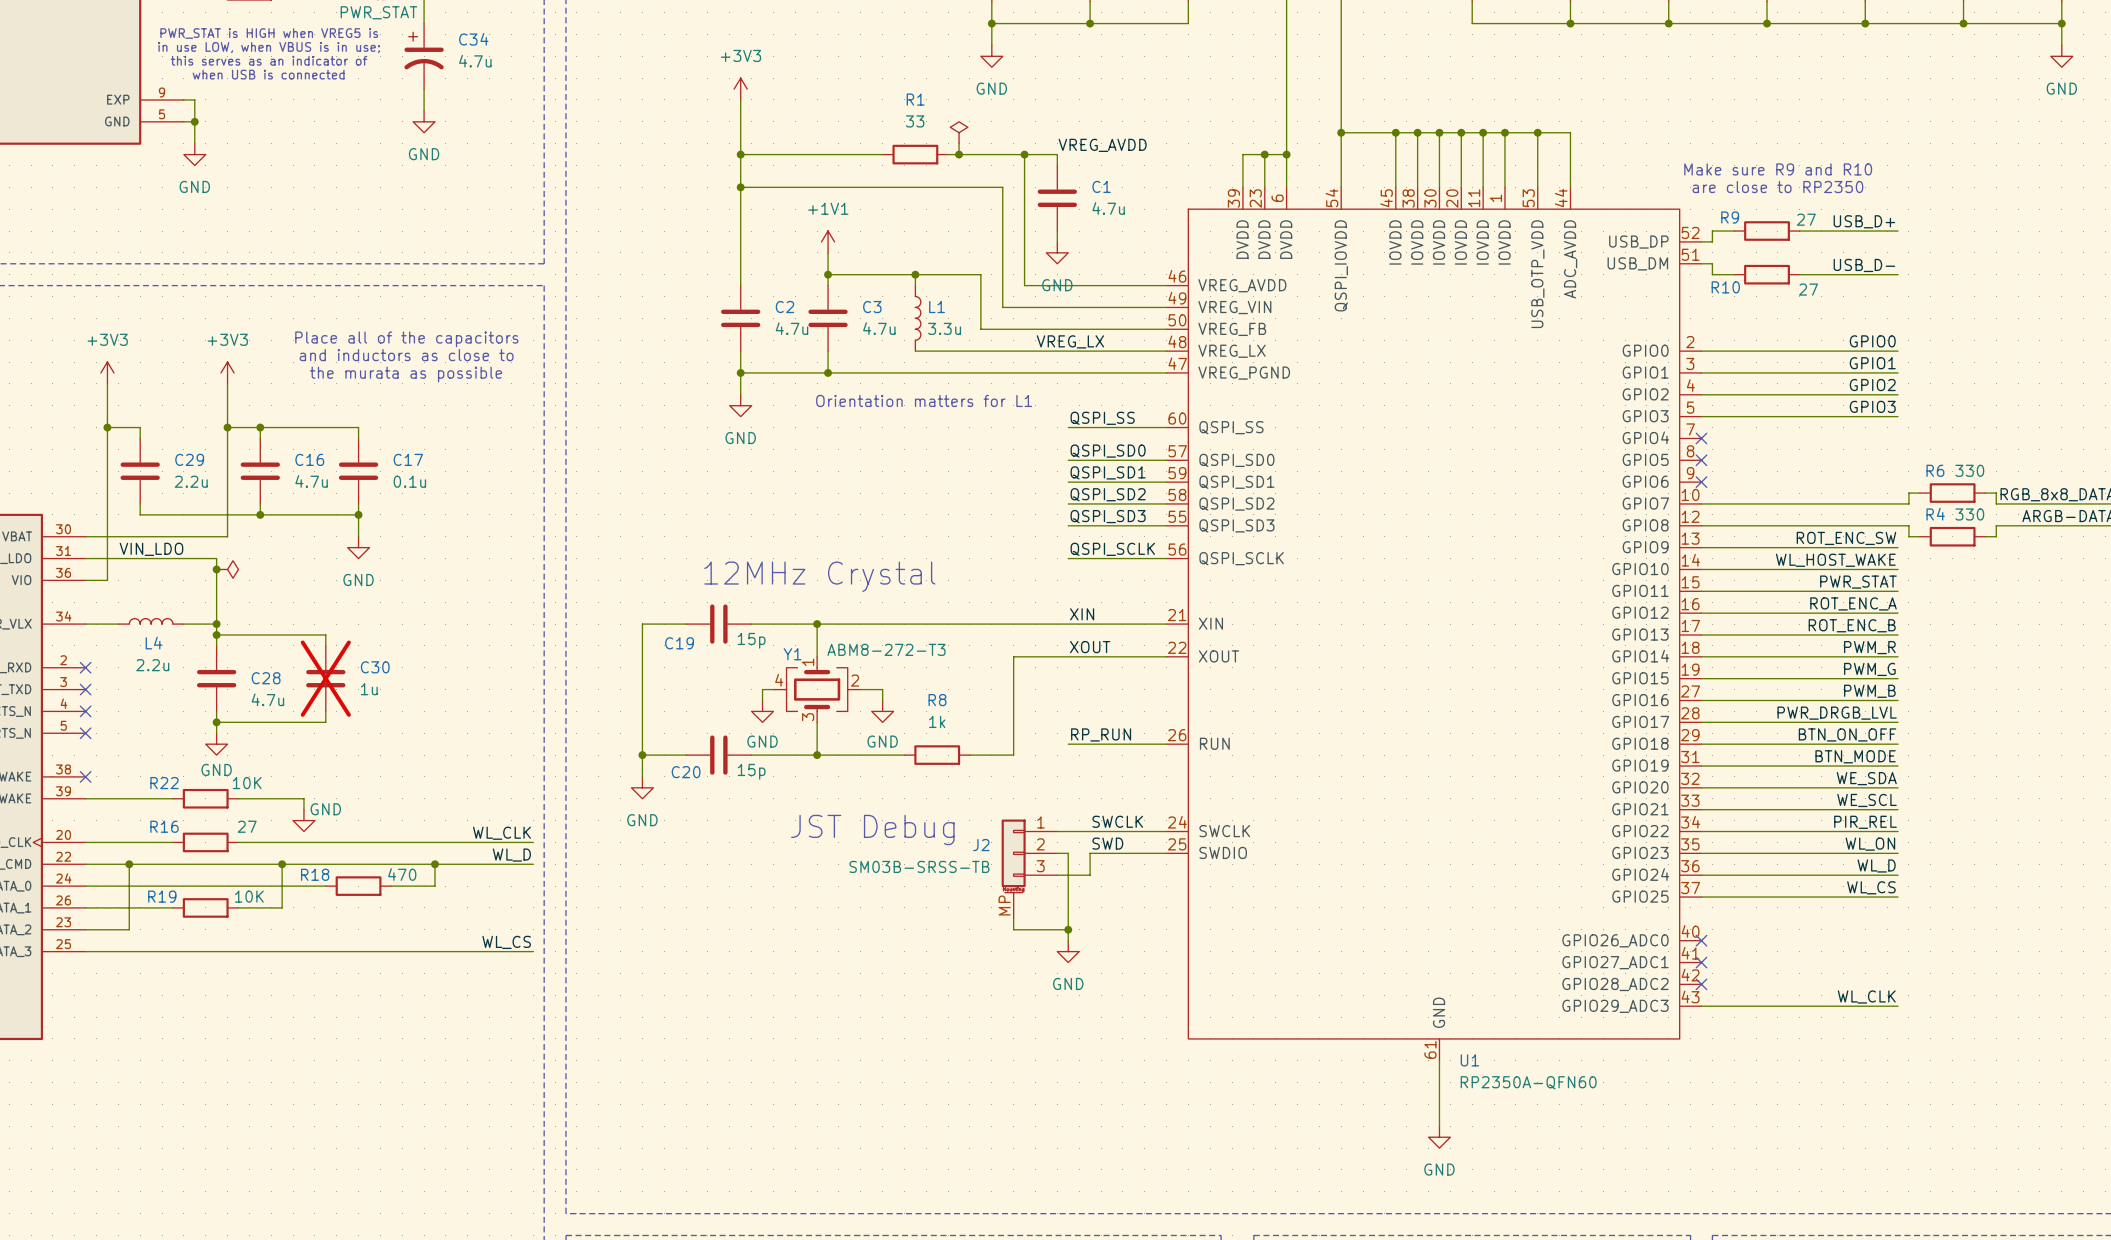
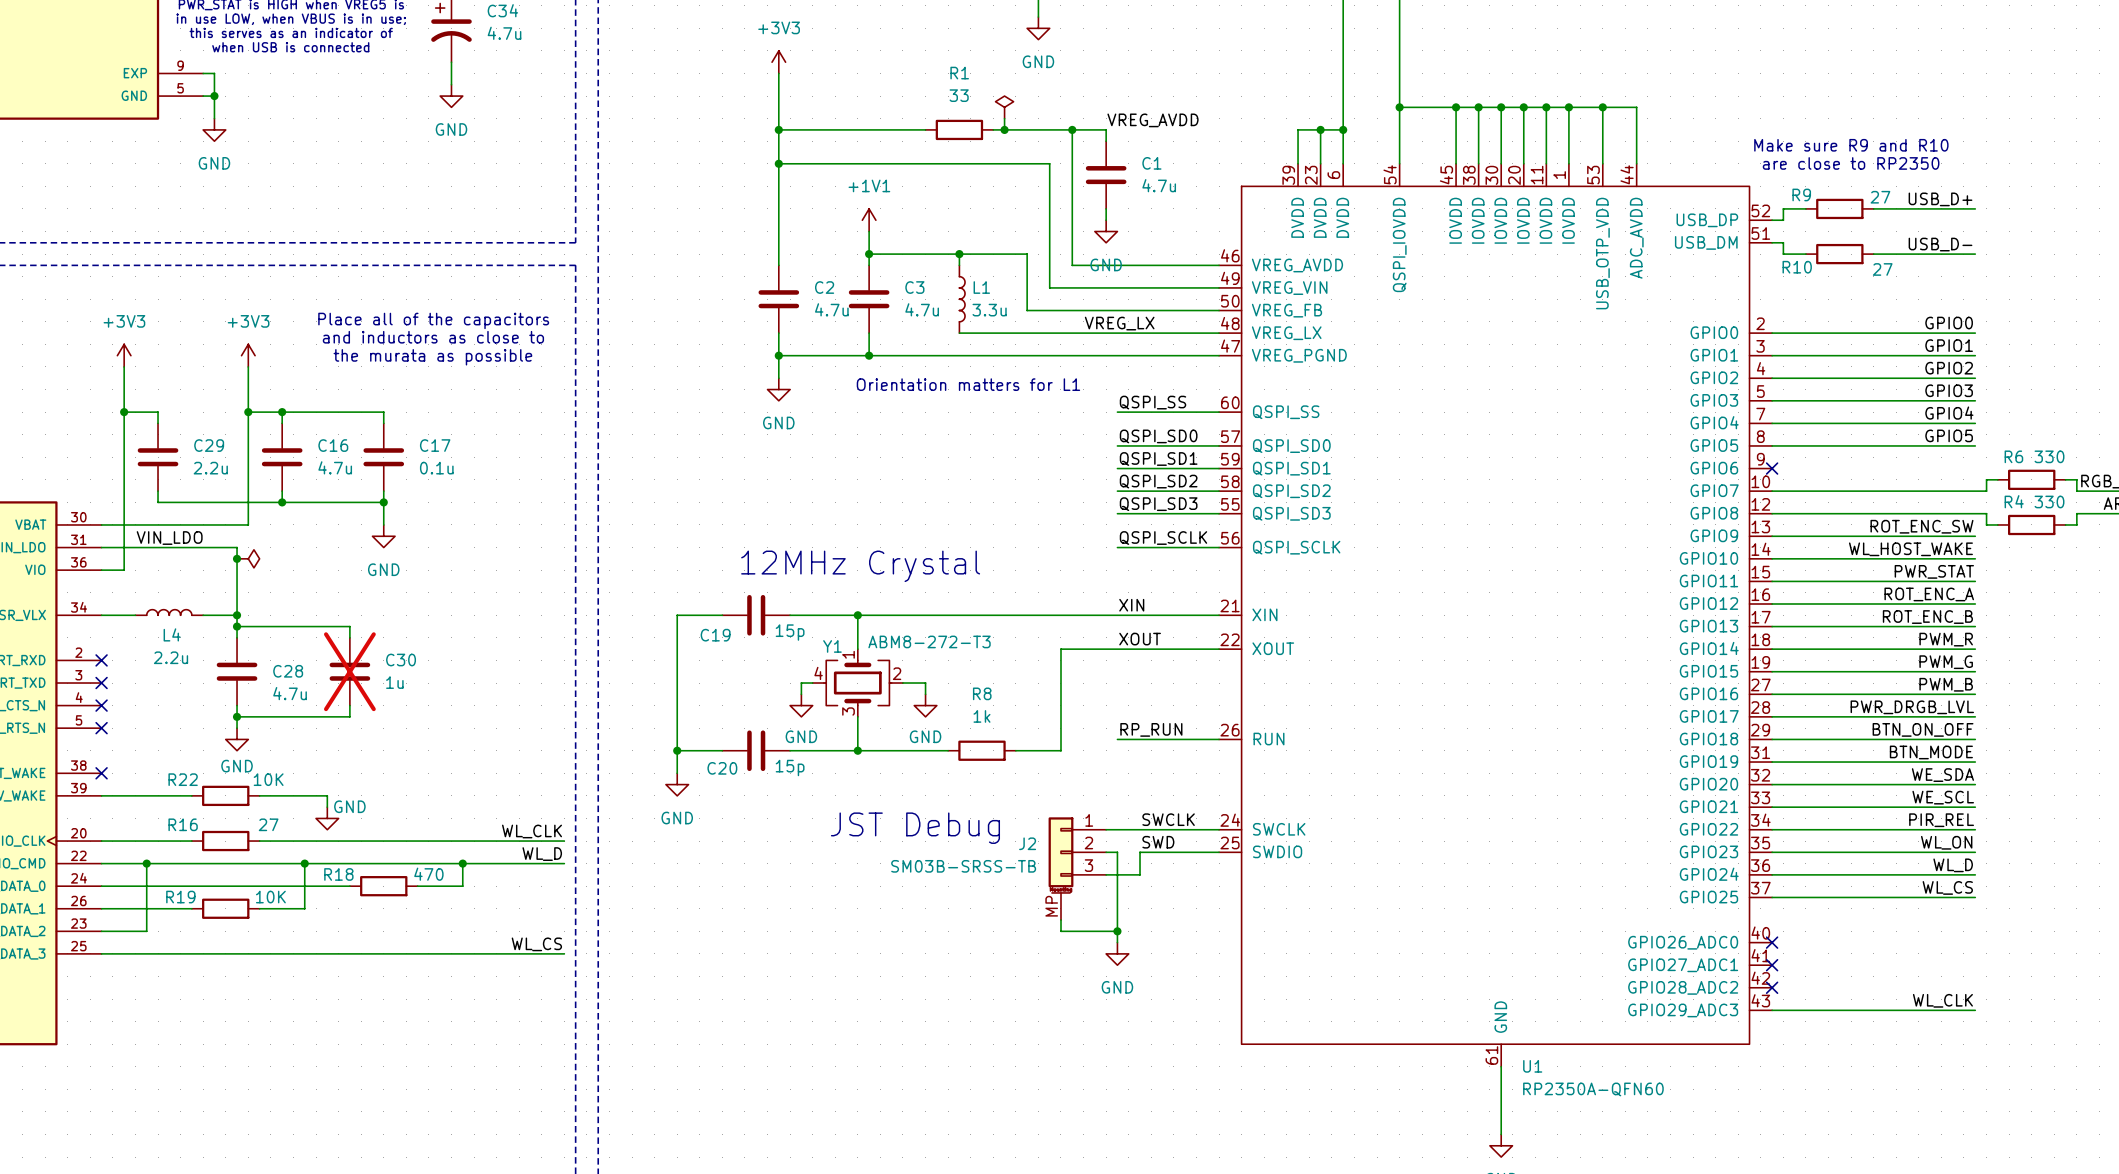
label: none -> GPIO4 (1949, 413)
wire: none -> (1772, 423) (1975, 423)
no-connect mark: (1701, 438) -> none
label: none -> GPIO5 (1949, 435)
wire: none -> (1772, 445) (1975, 445)
no-connect mark: (1701, 460) -> none

